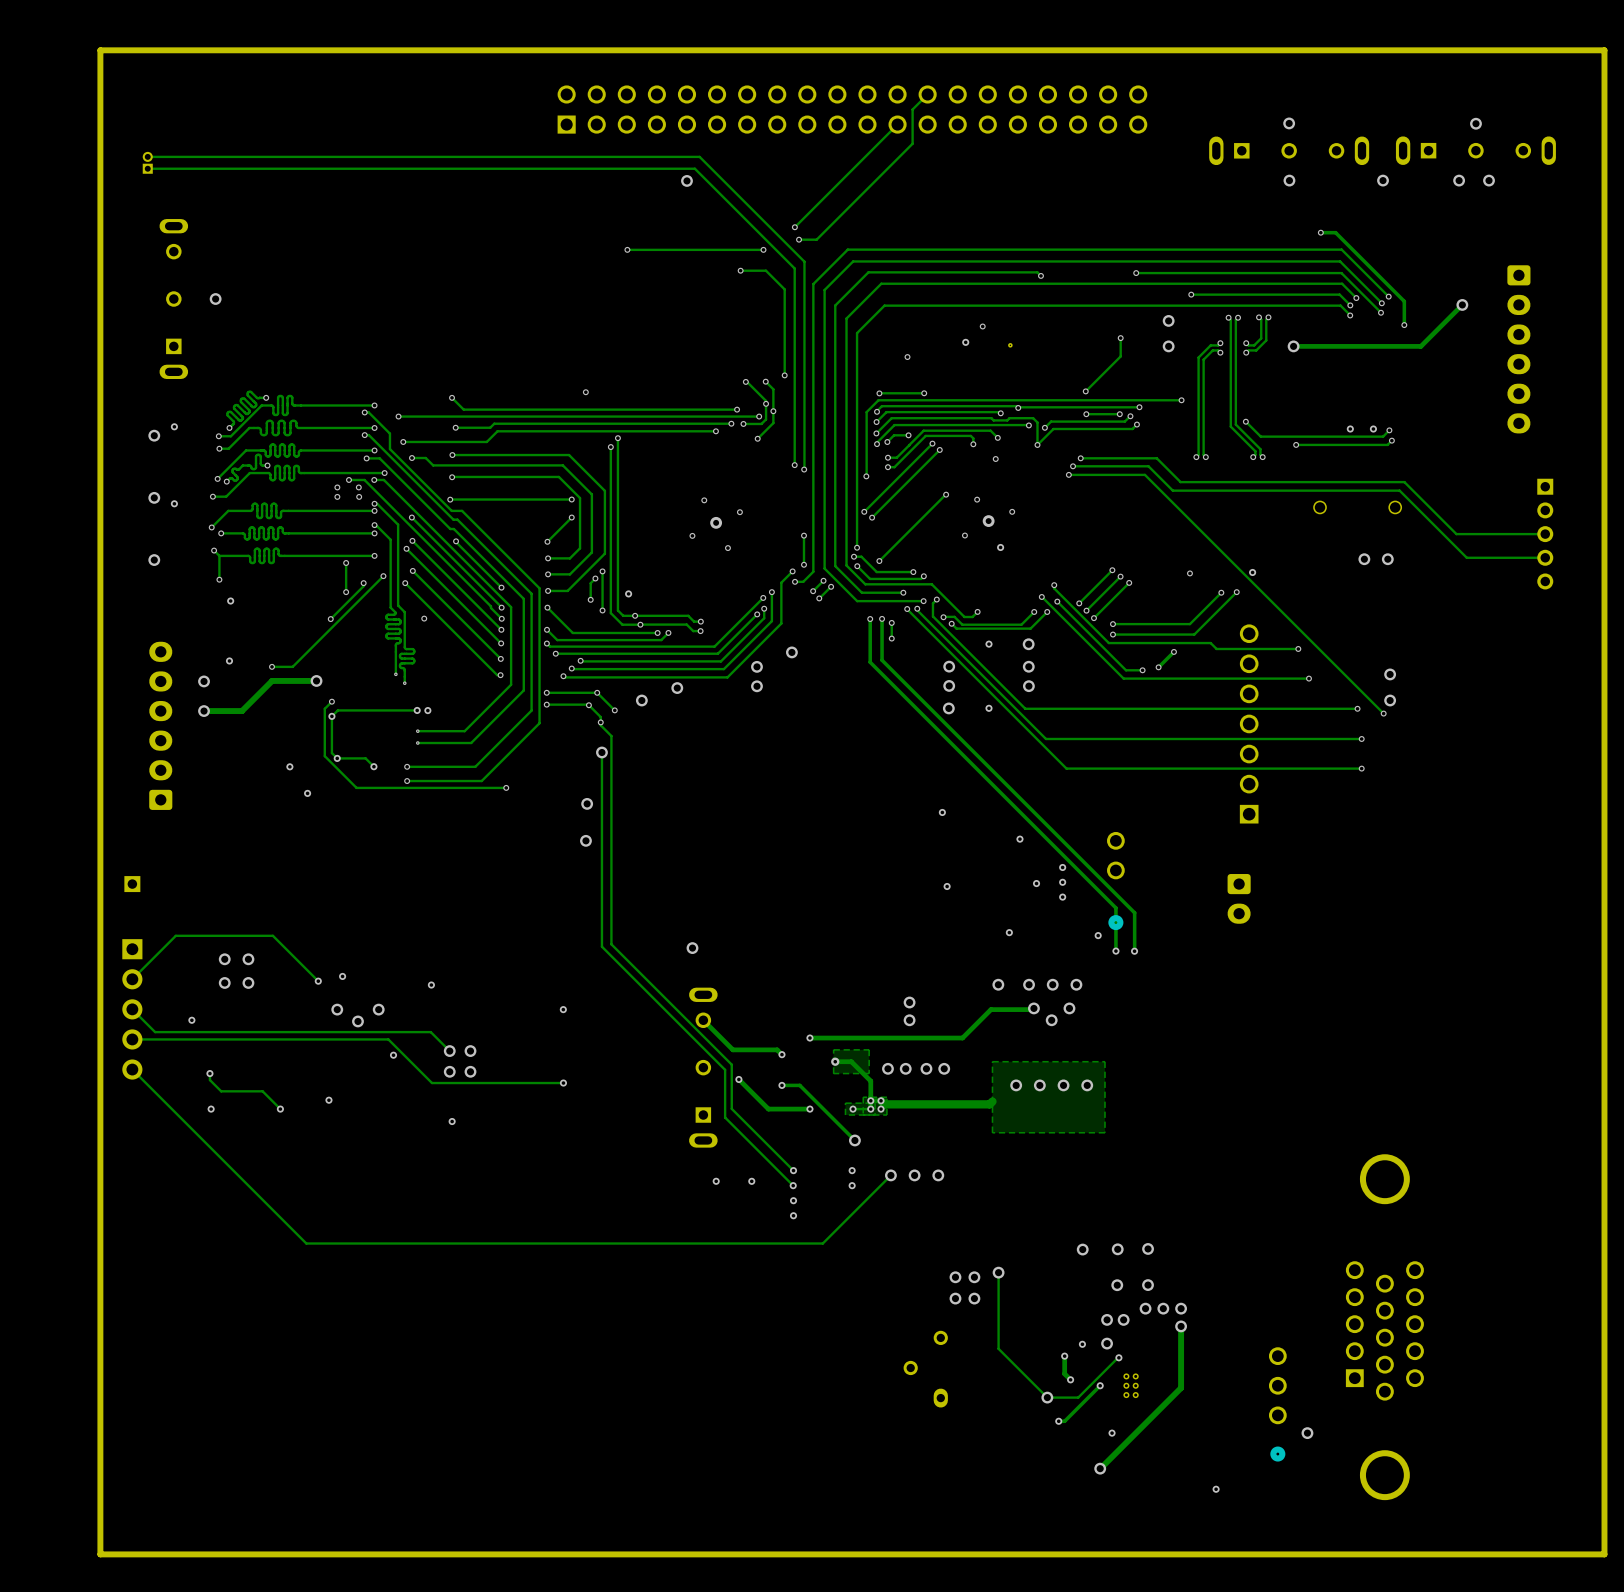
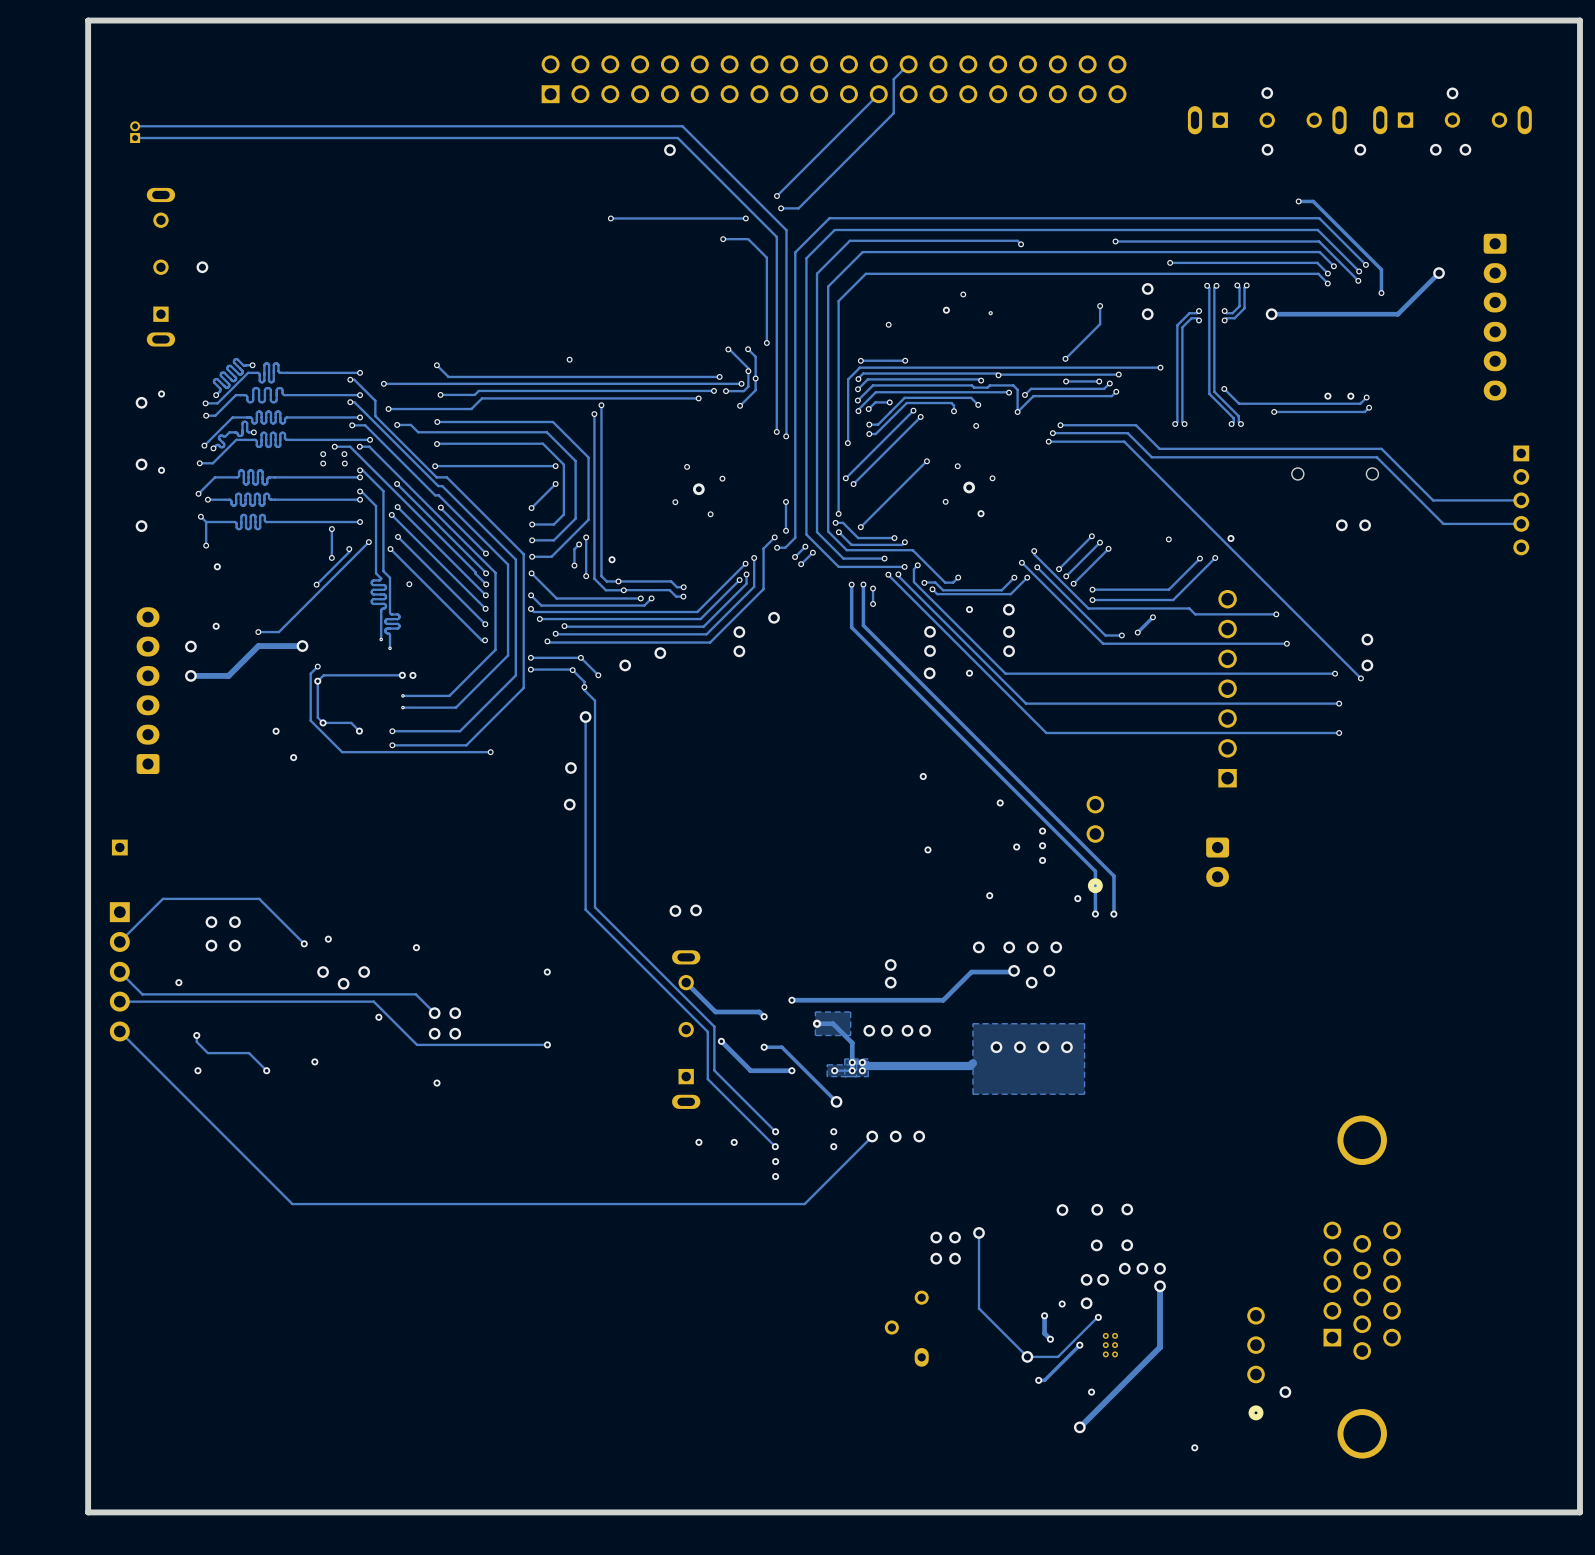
via: none -> (696, 910)

